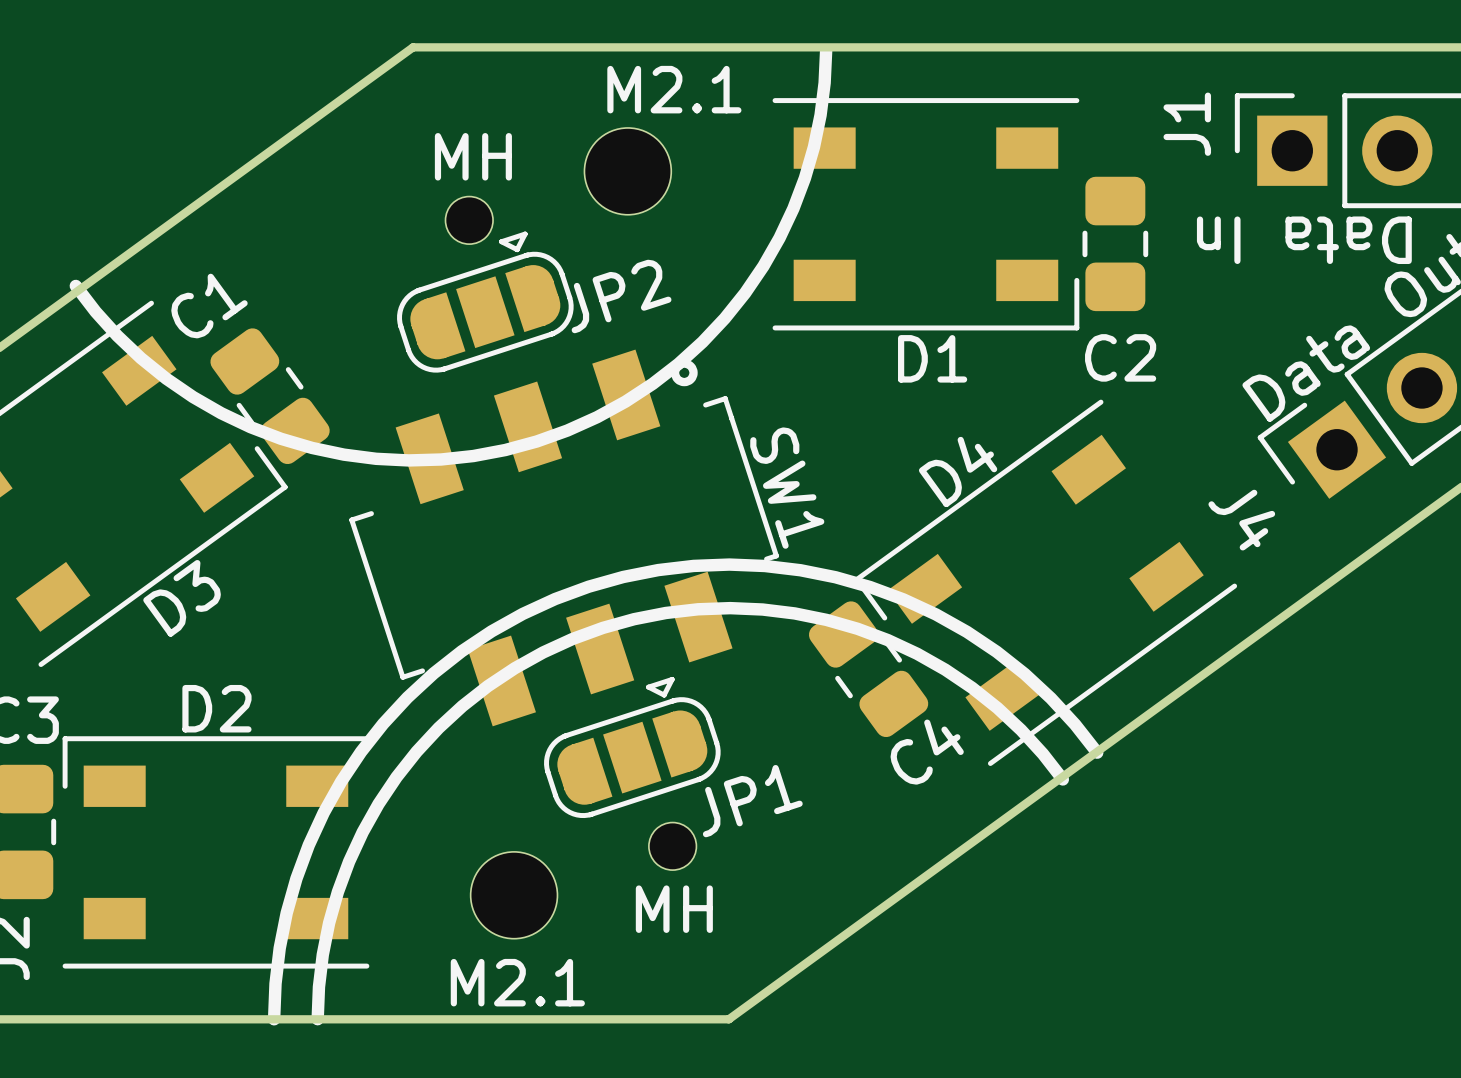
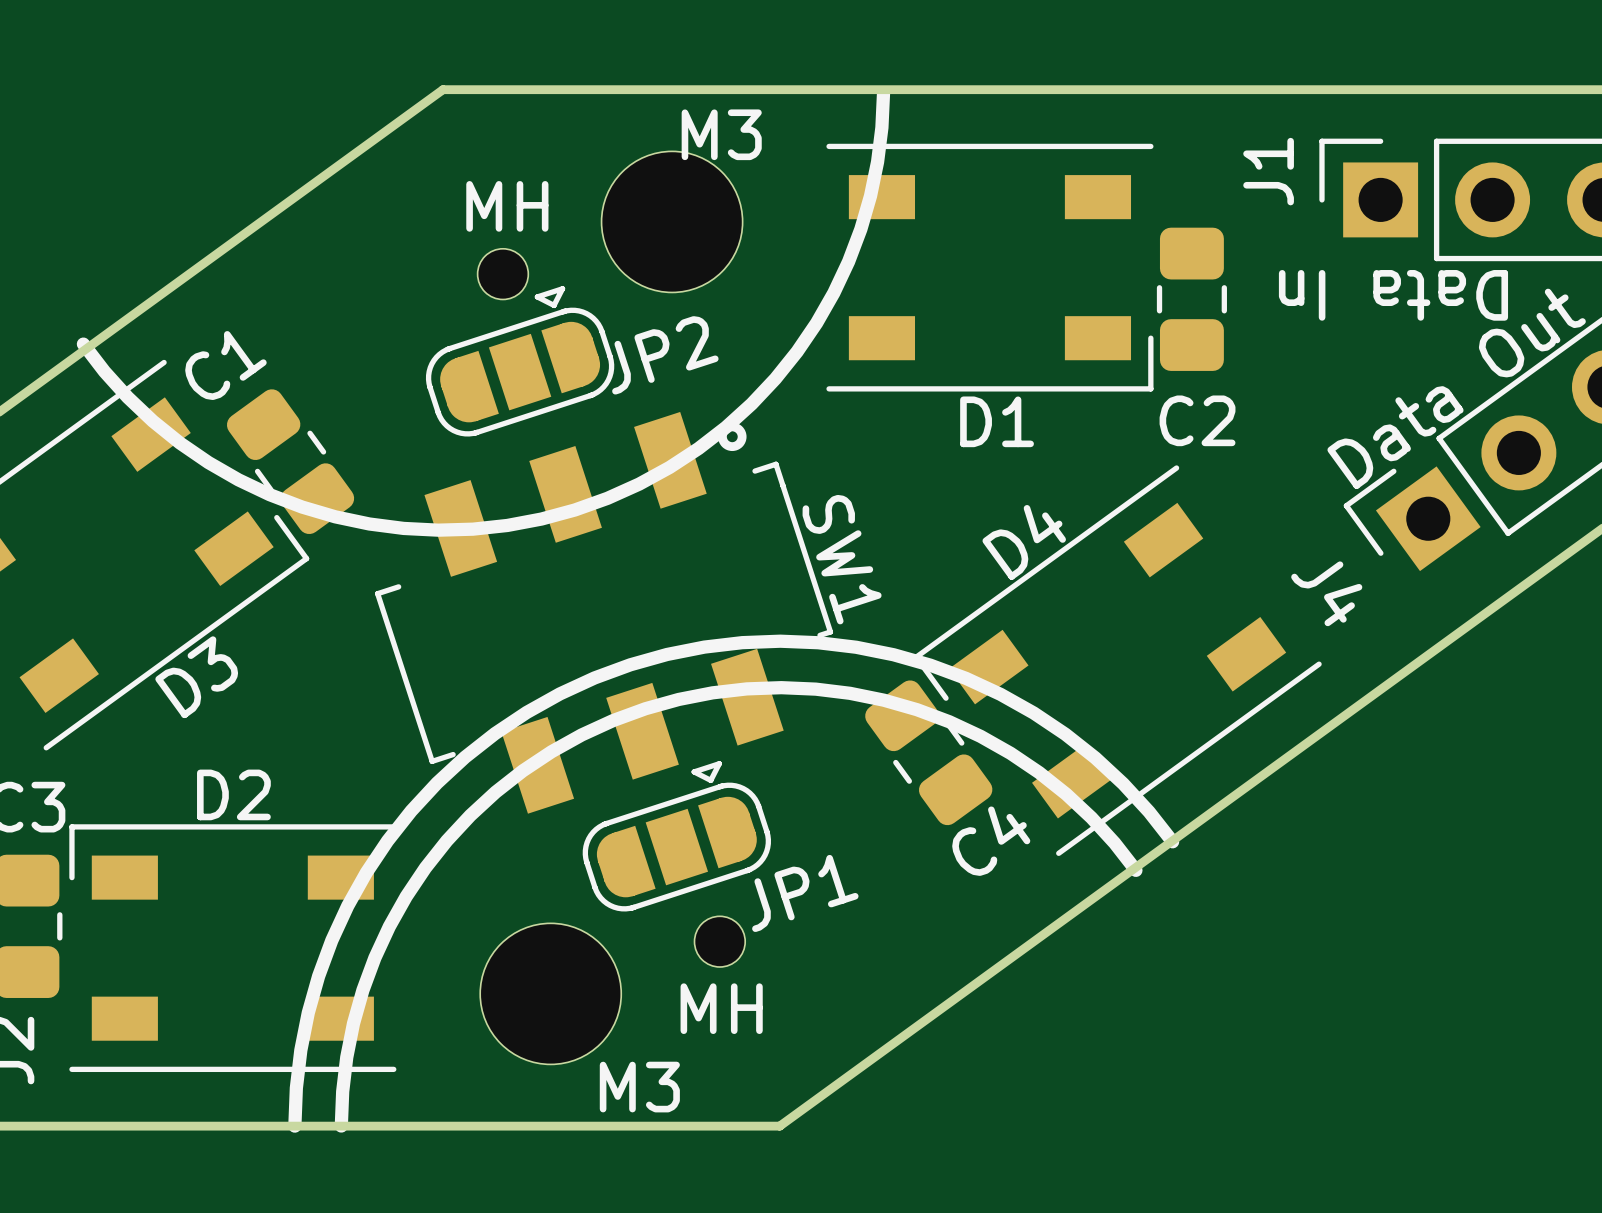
M2.1: (627, 171) -> none
M3: none -> (672, 221)
M2.1: (514, 895) -> none
M3: none -> (550, 993)

